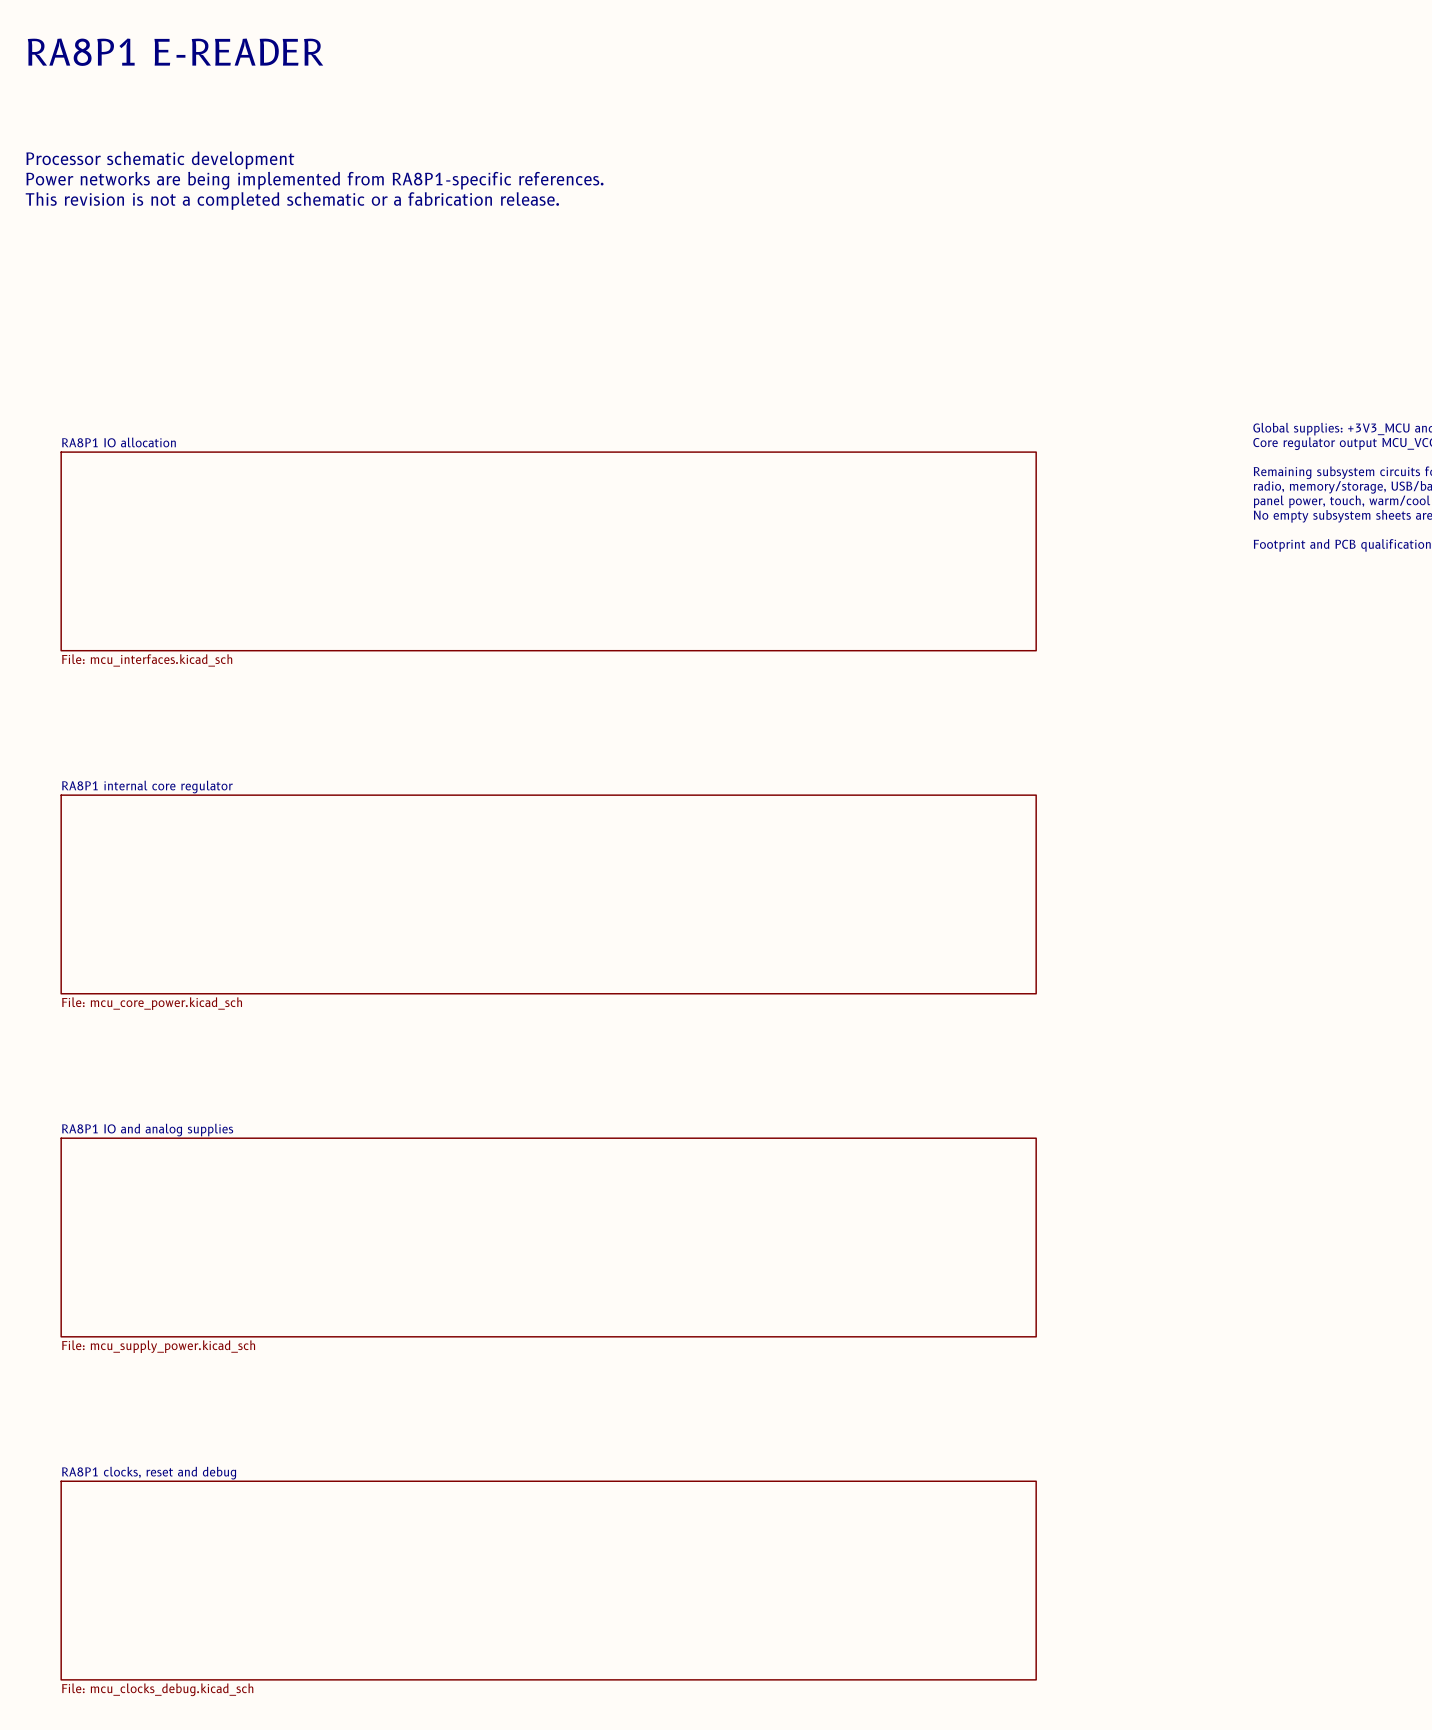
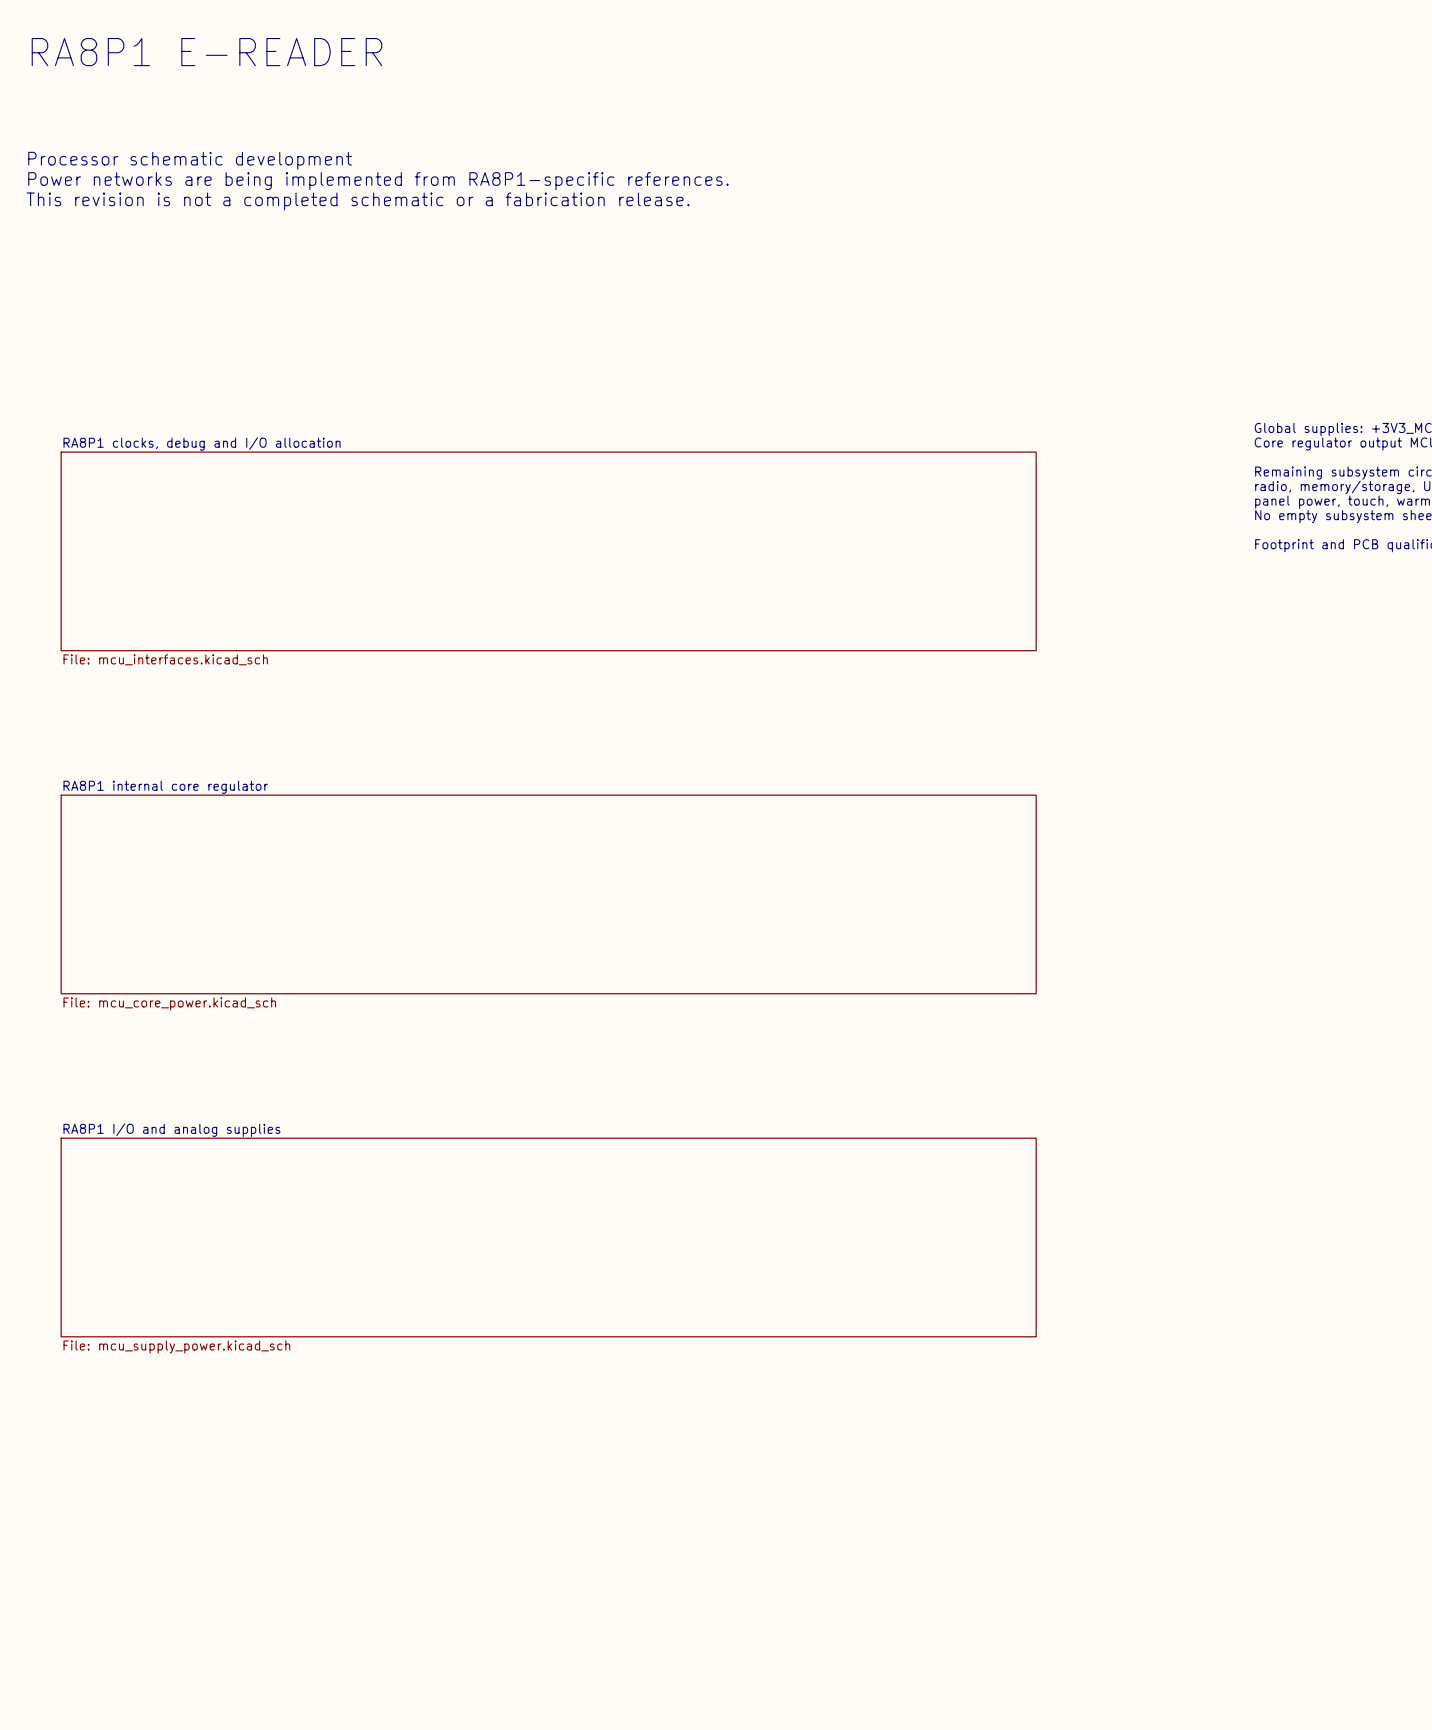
sheet RA8P1 IO allocation name: RA8P1 IO allocation (118, 442) -> RA8P1 clocks, debug and I/O allocation (202, 444)
sheet RA8P1 IO and analog supplies name: RA8P1 IO and analog supplies (147, 1130) -> RA8P1 I/O and analog supplies (171, 1130)
sheet RA8P1 clocks, reset and debug: File: mcu_clocks_debug.kicad_sch (548, 1580) -> none

